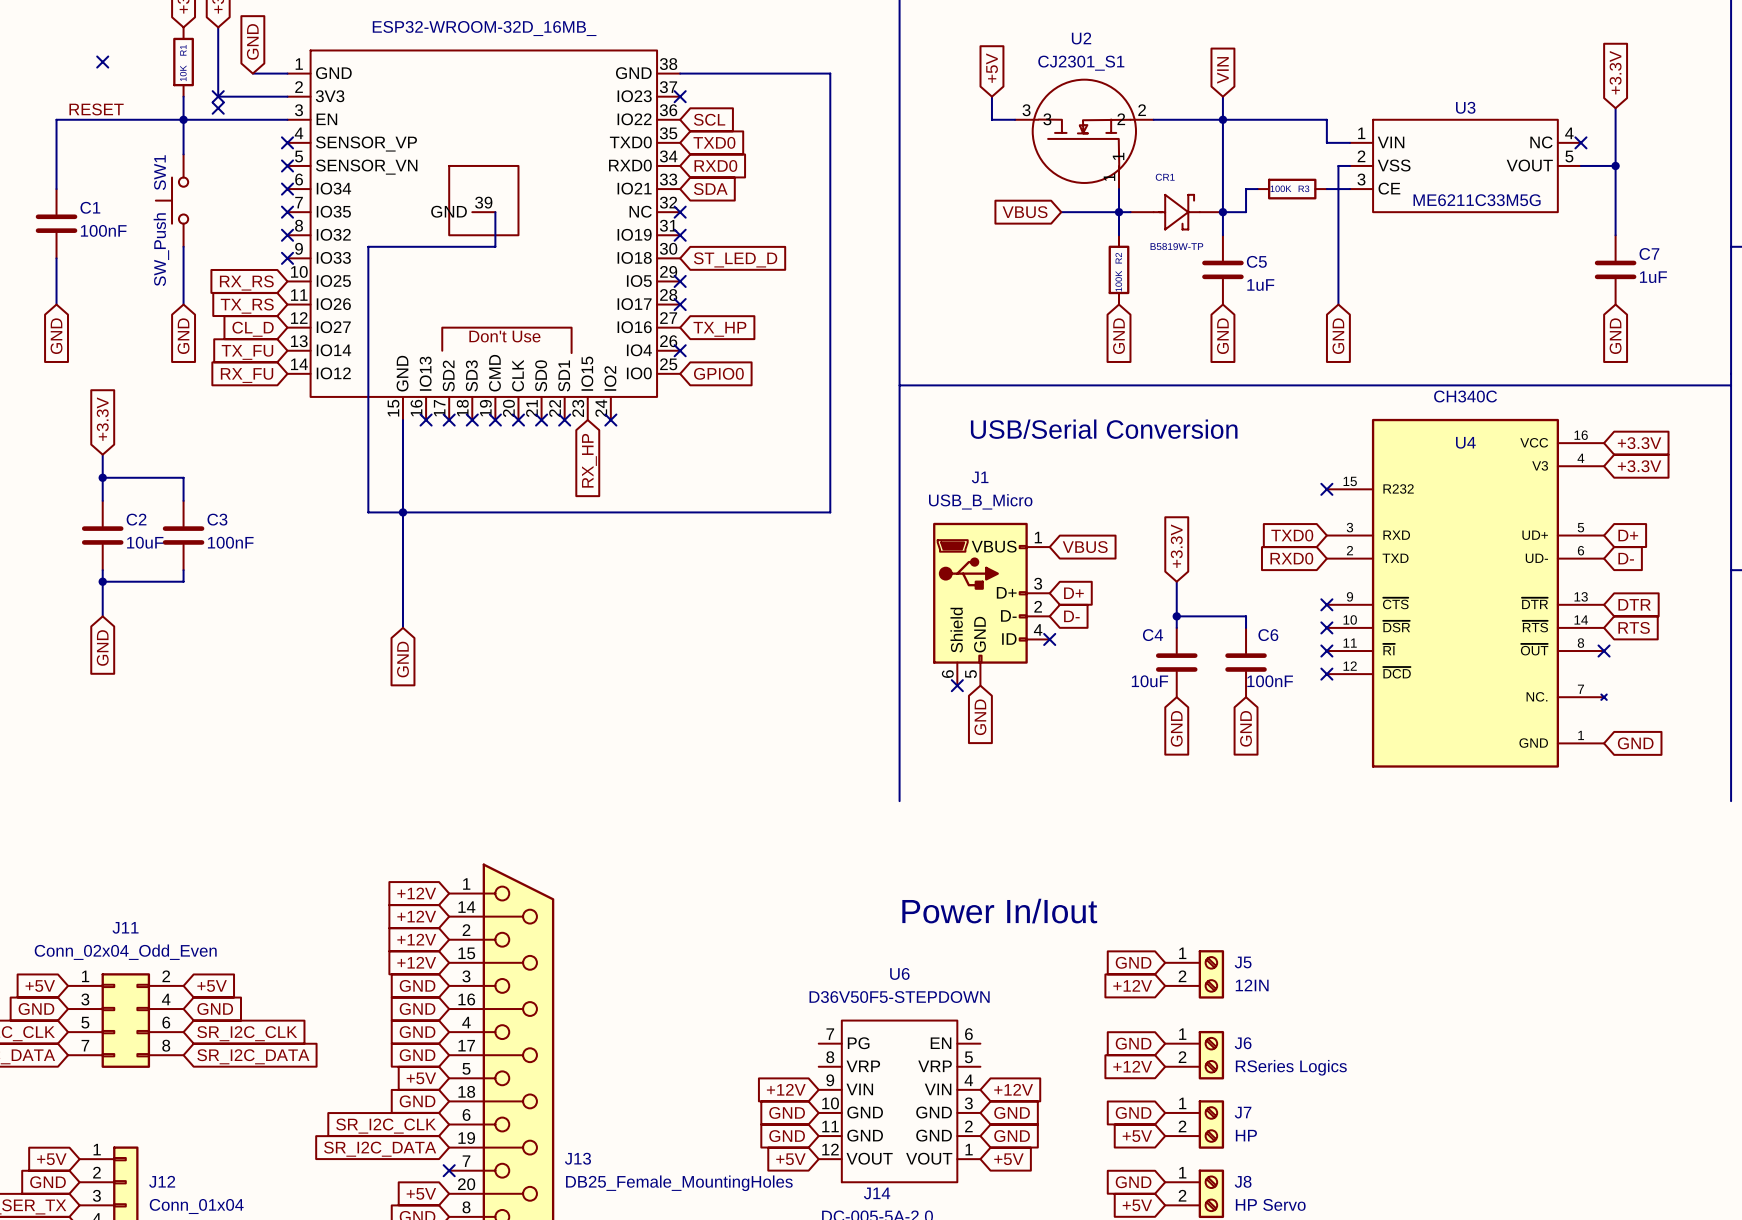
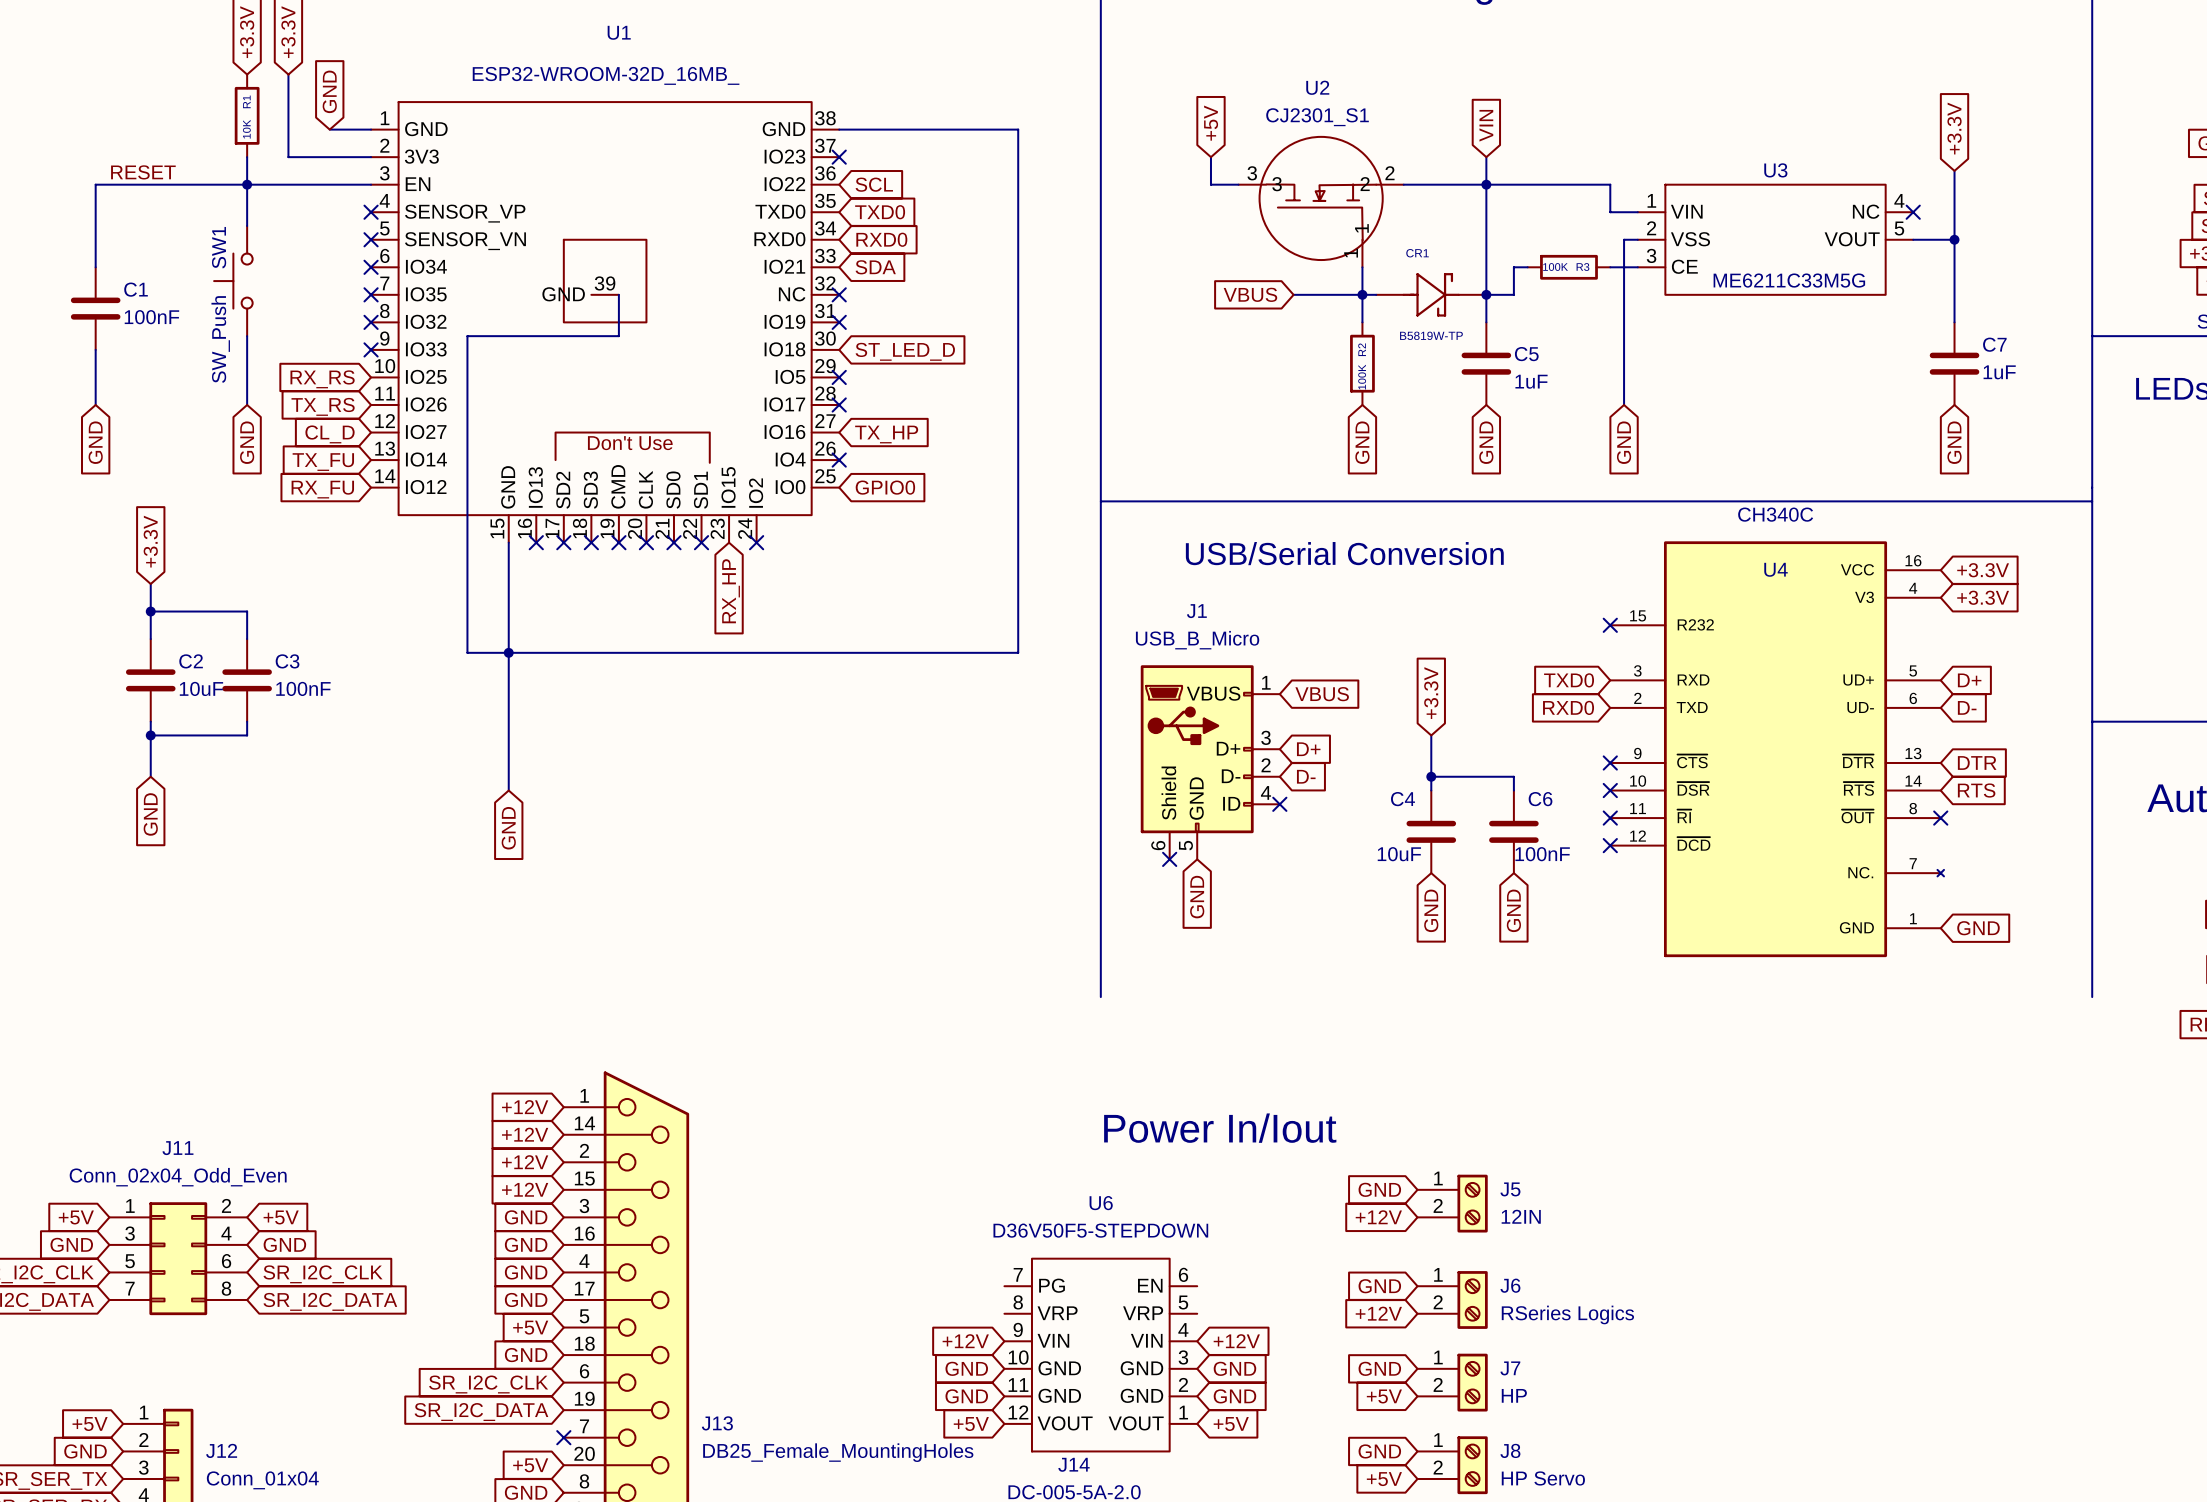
no-connect mark: (102, 62) -> none
no-connect mark: (218, 96) -> none
no-connect mark: (218, 108) -> none

